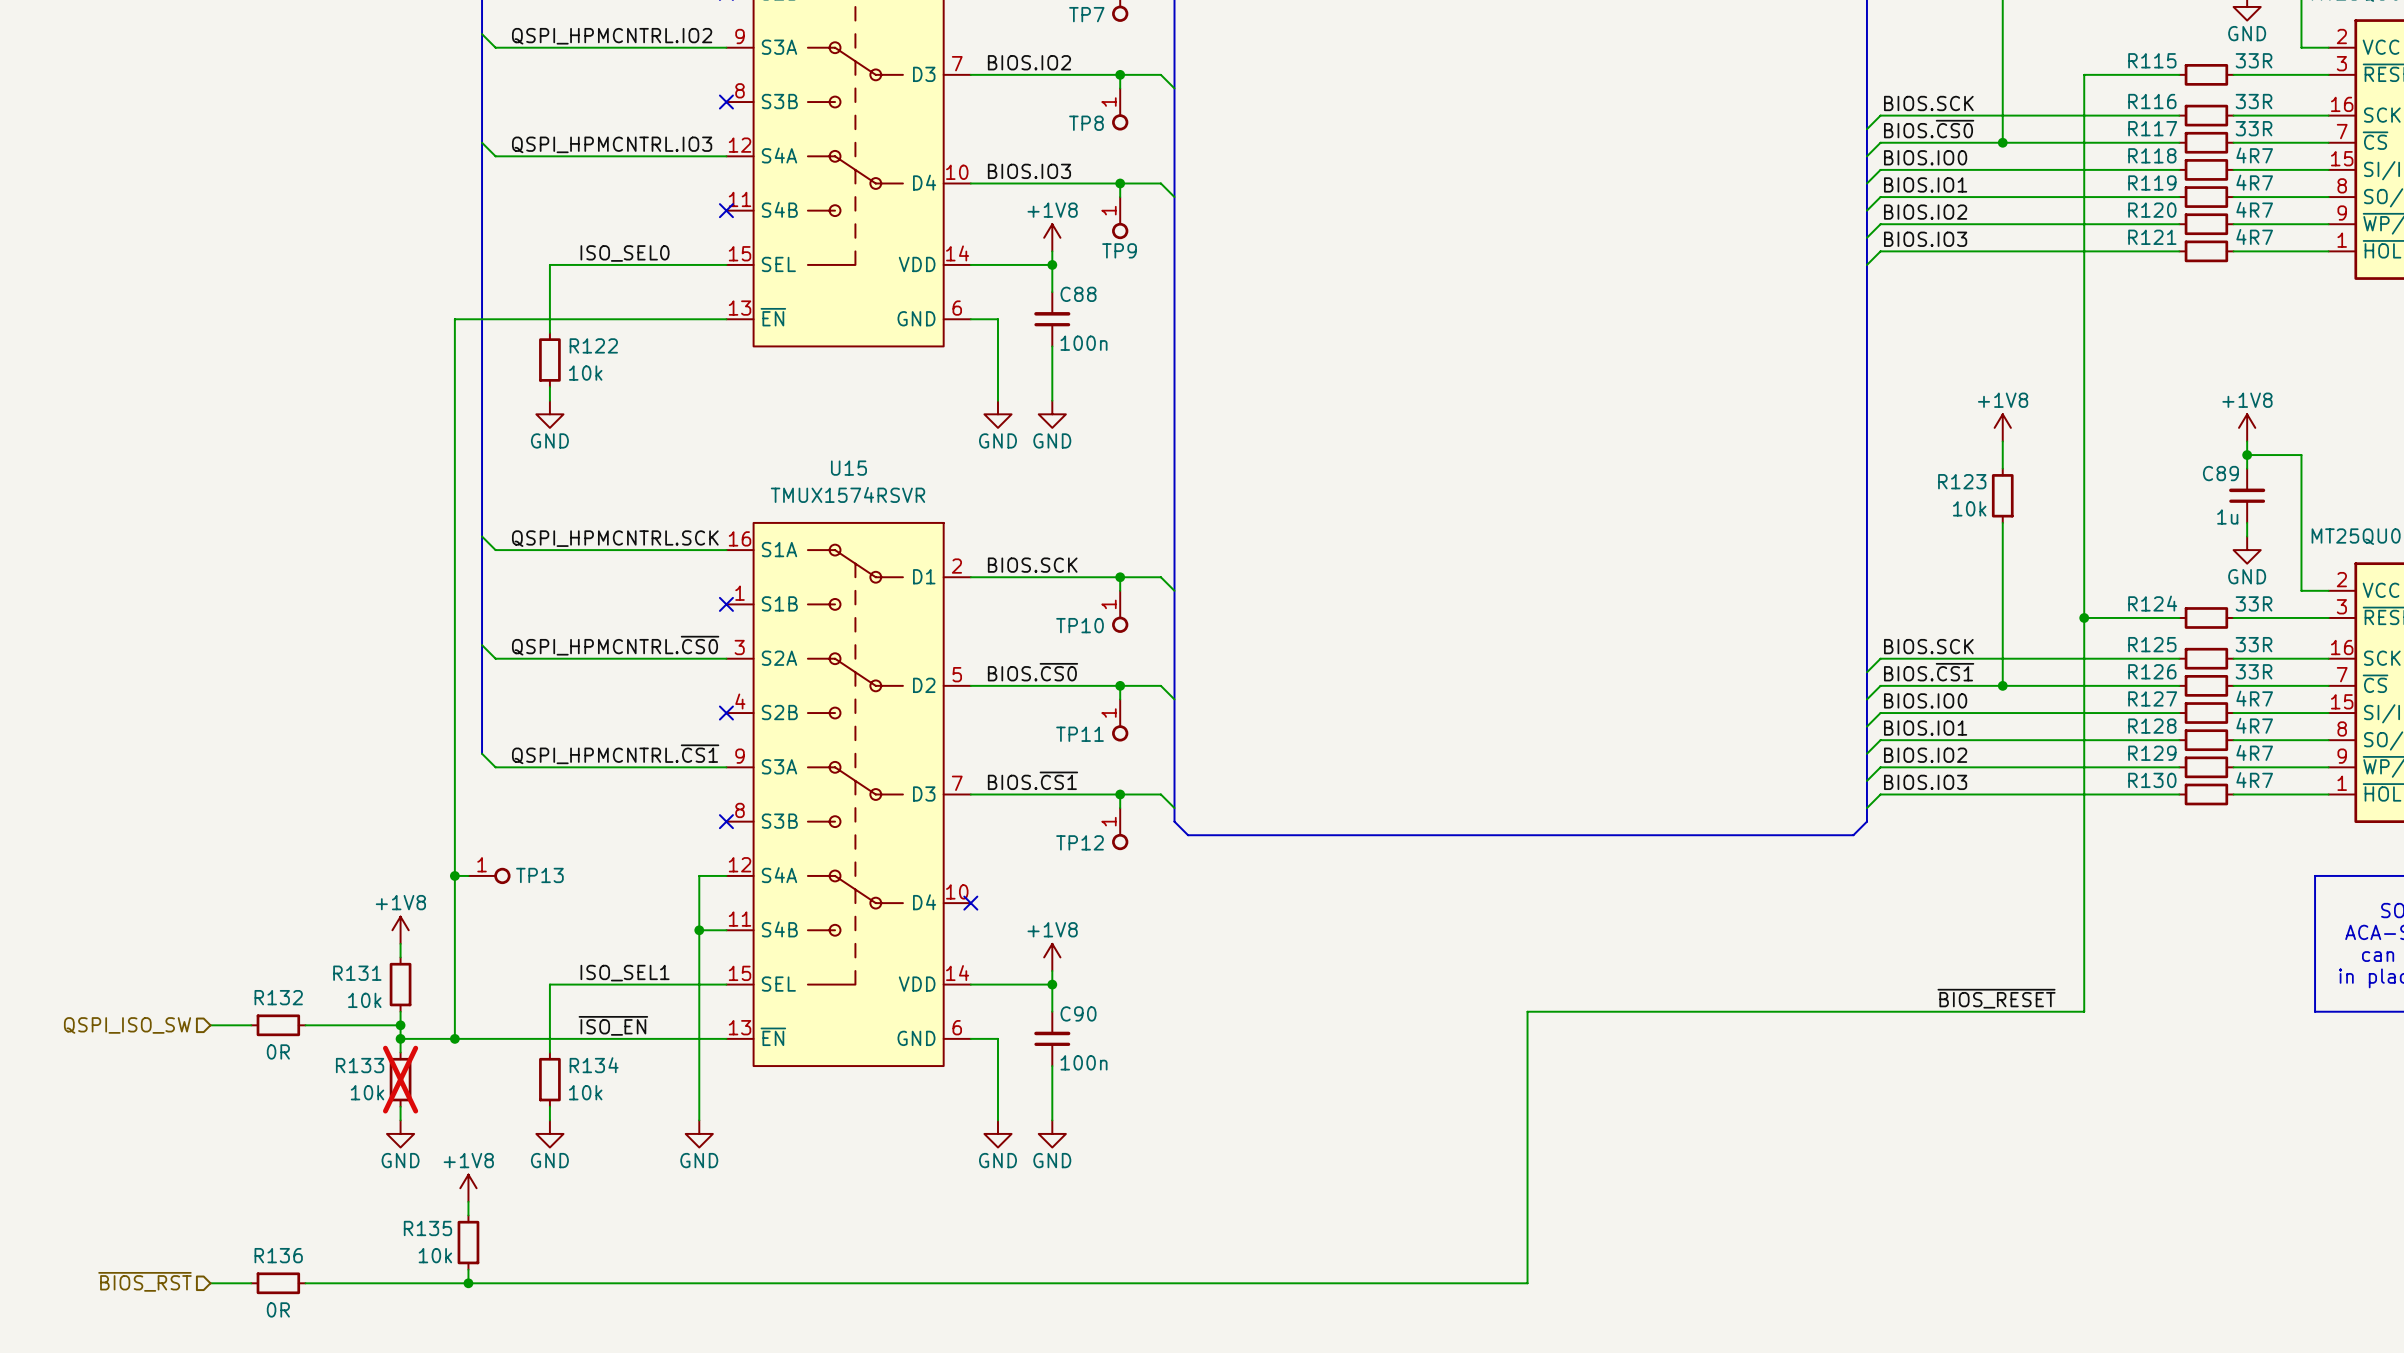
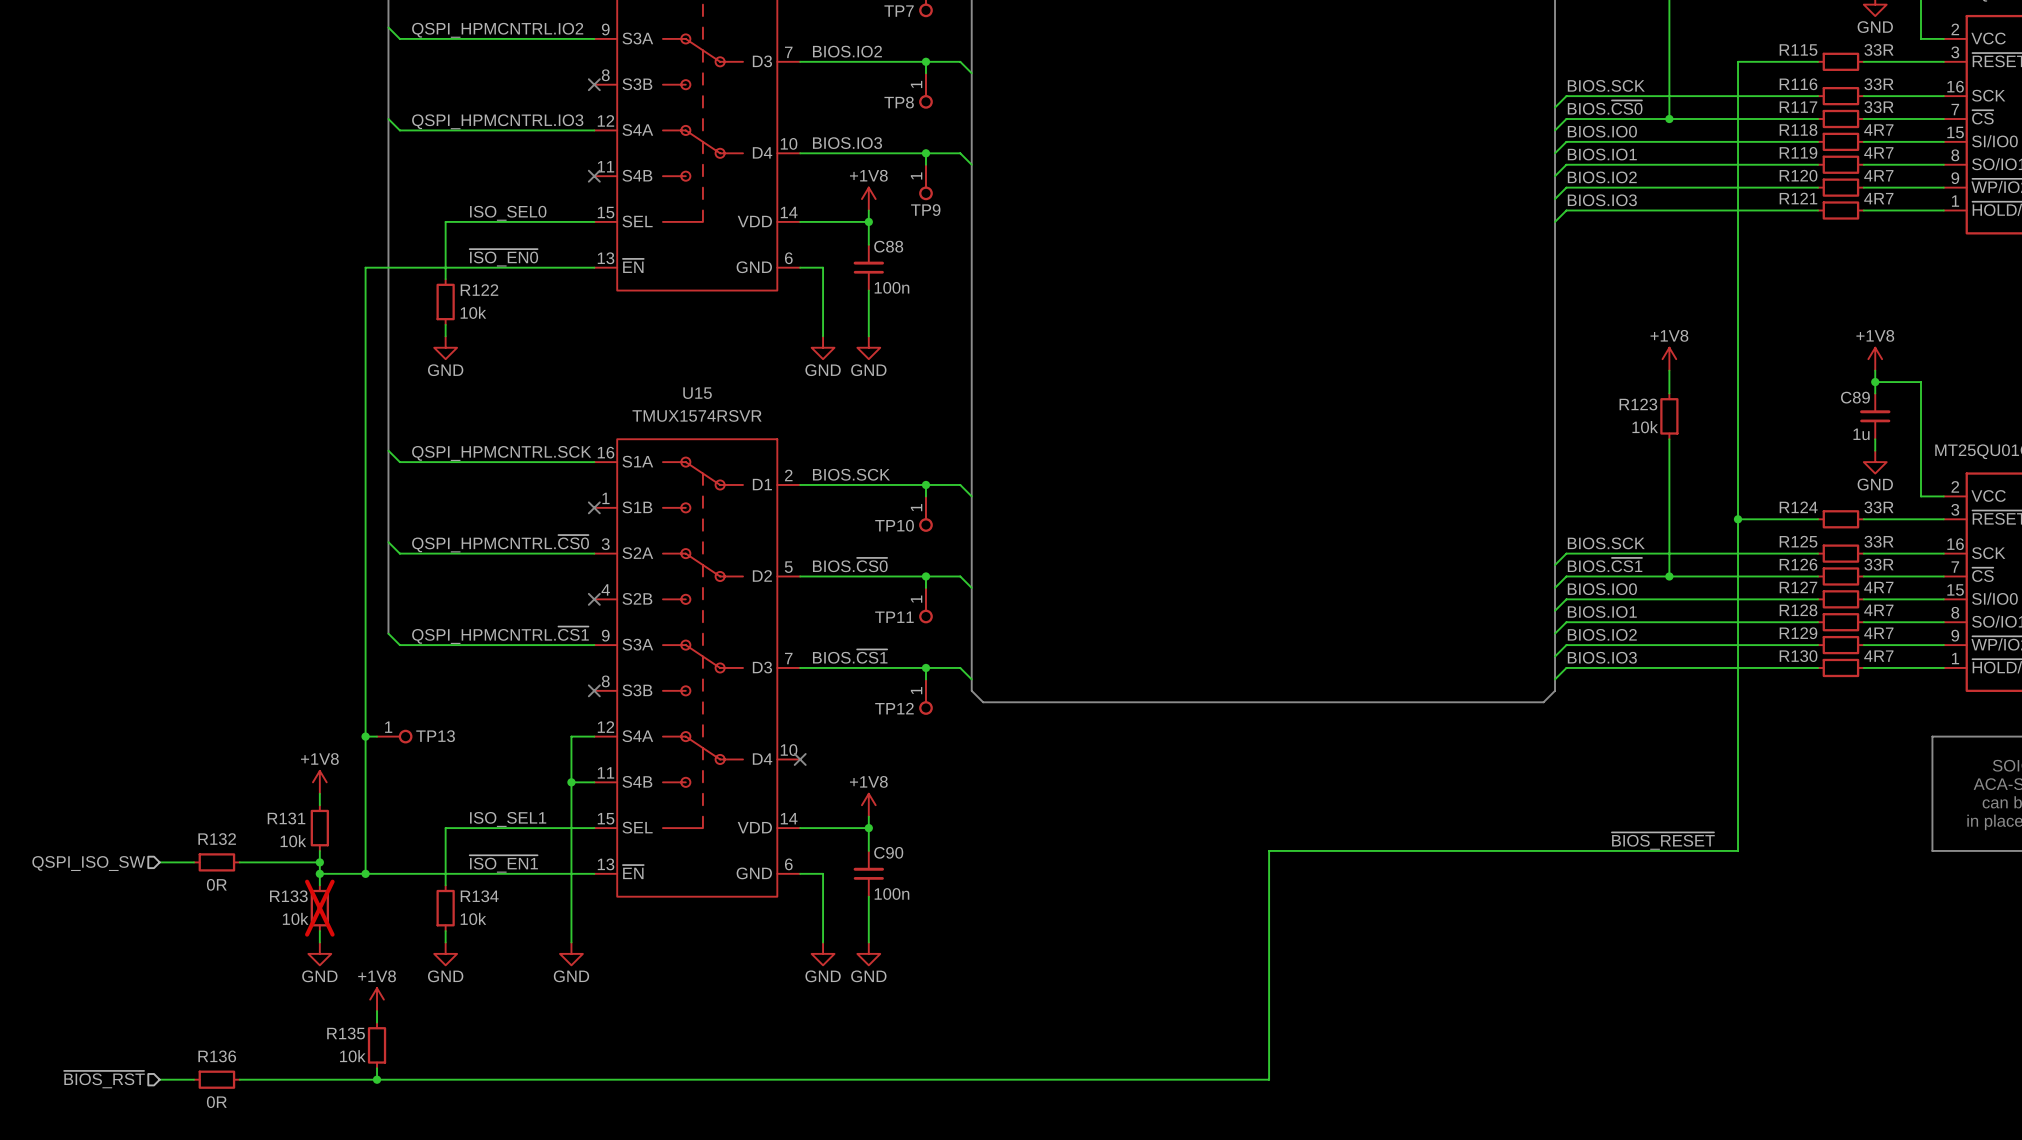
label: none -> ~{ISO_EN0} (503, 257)
label: ~{ISO_EN} (613, 1025) -> ~{ISO_EN1} (503, 863)

